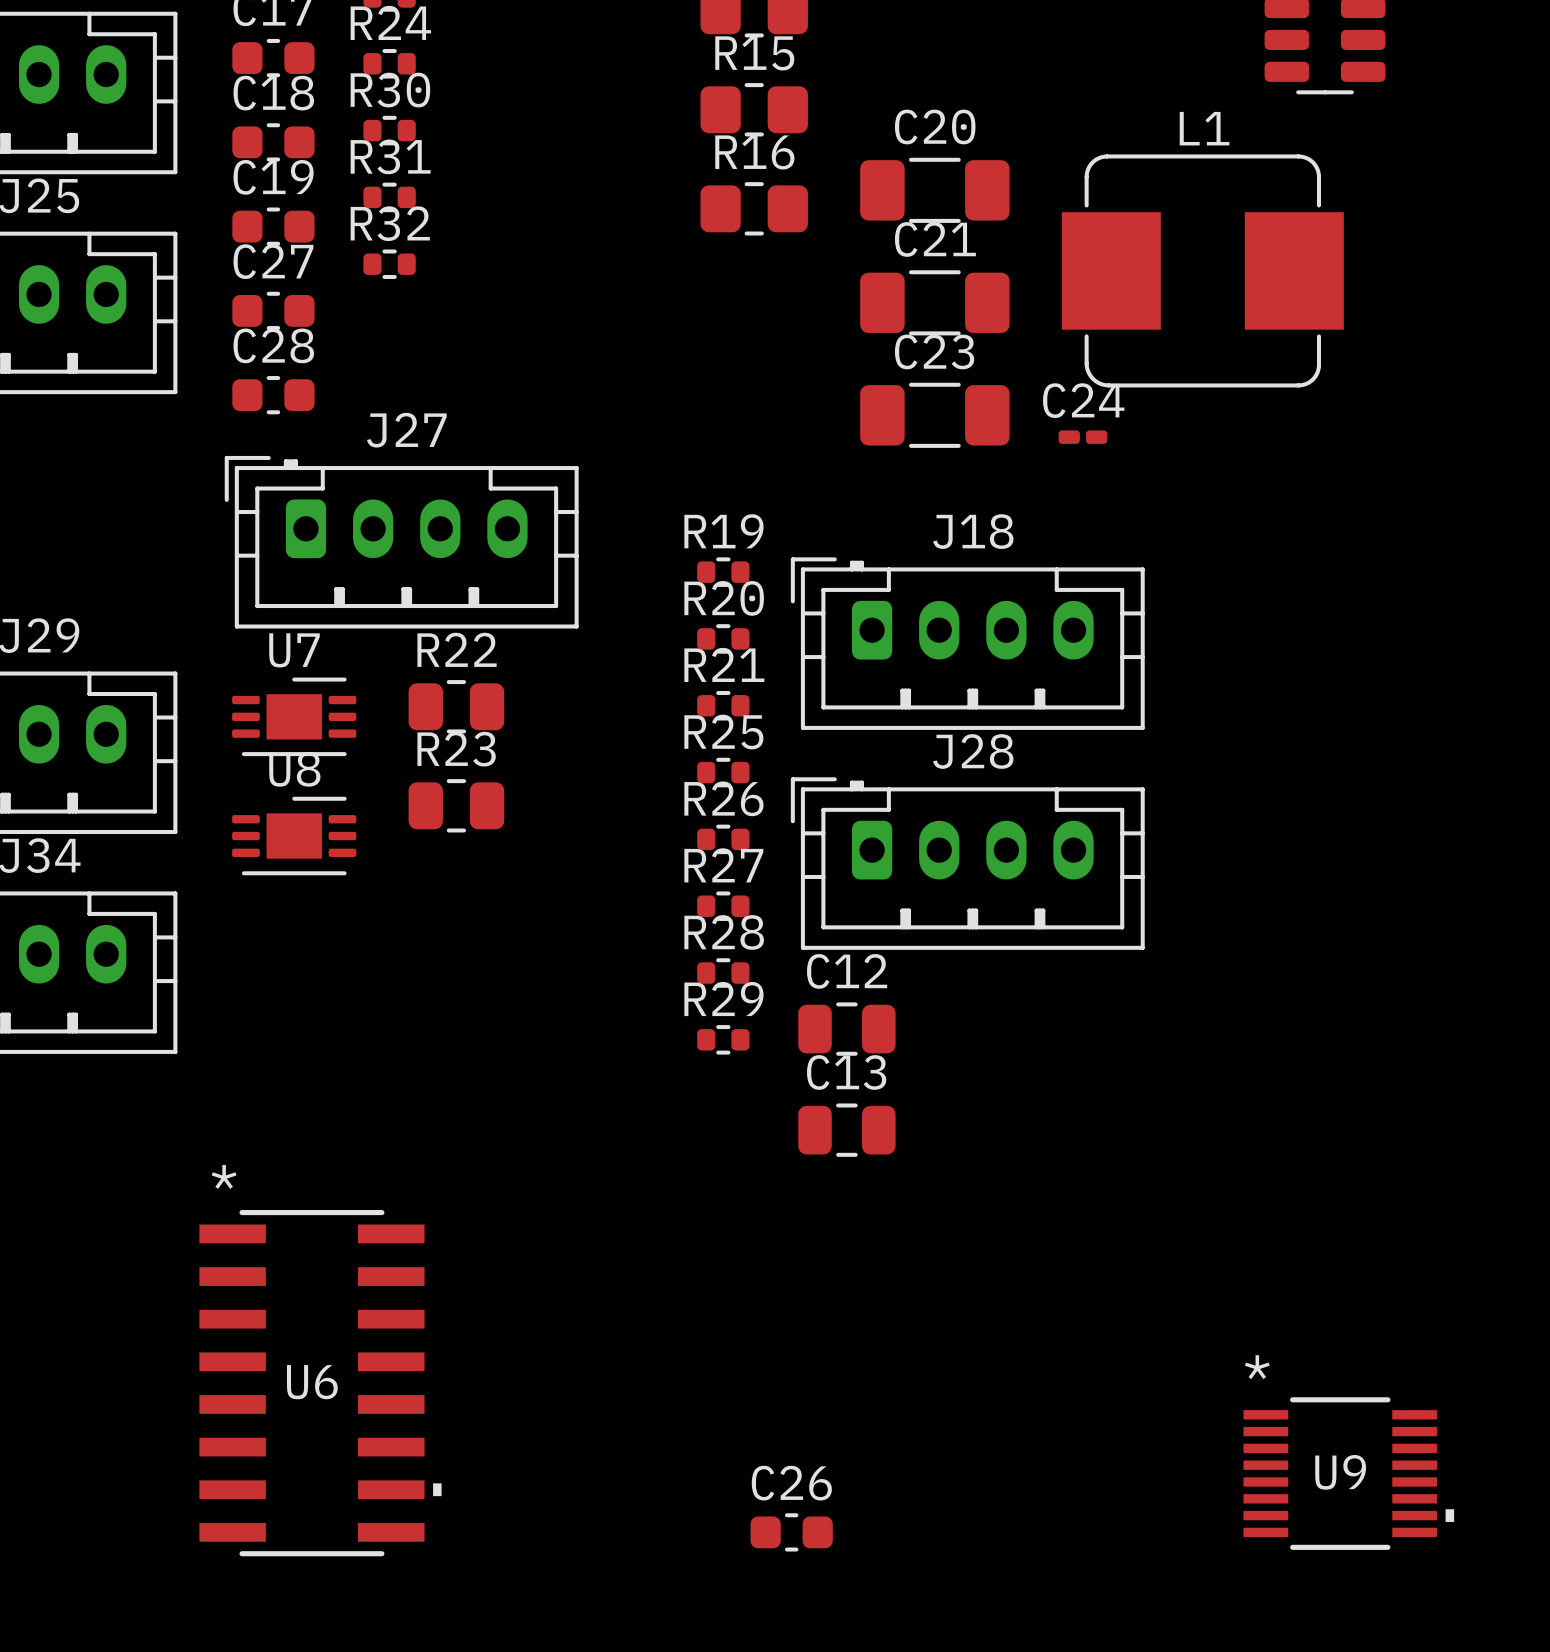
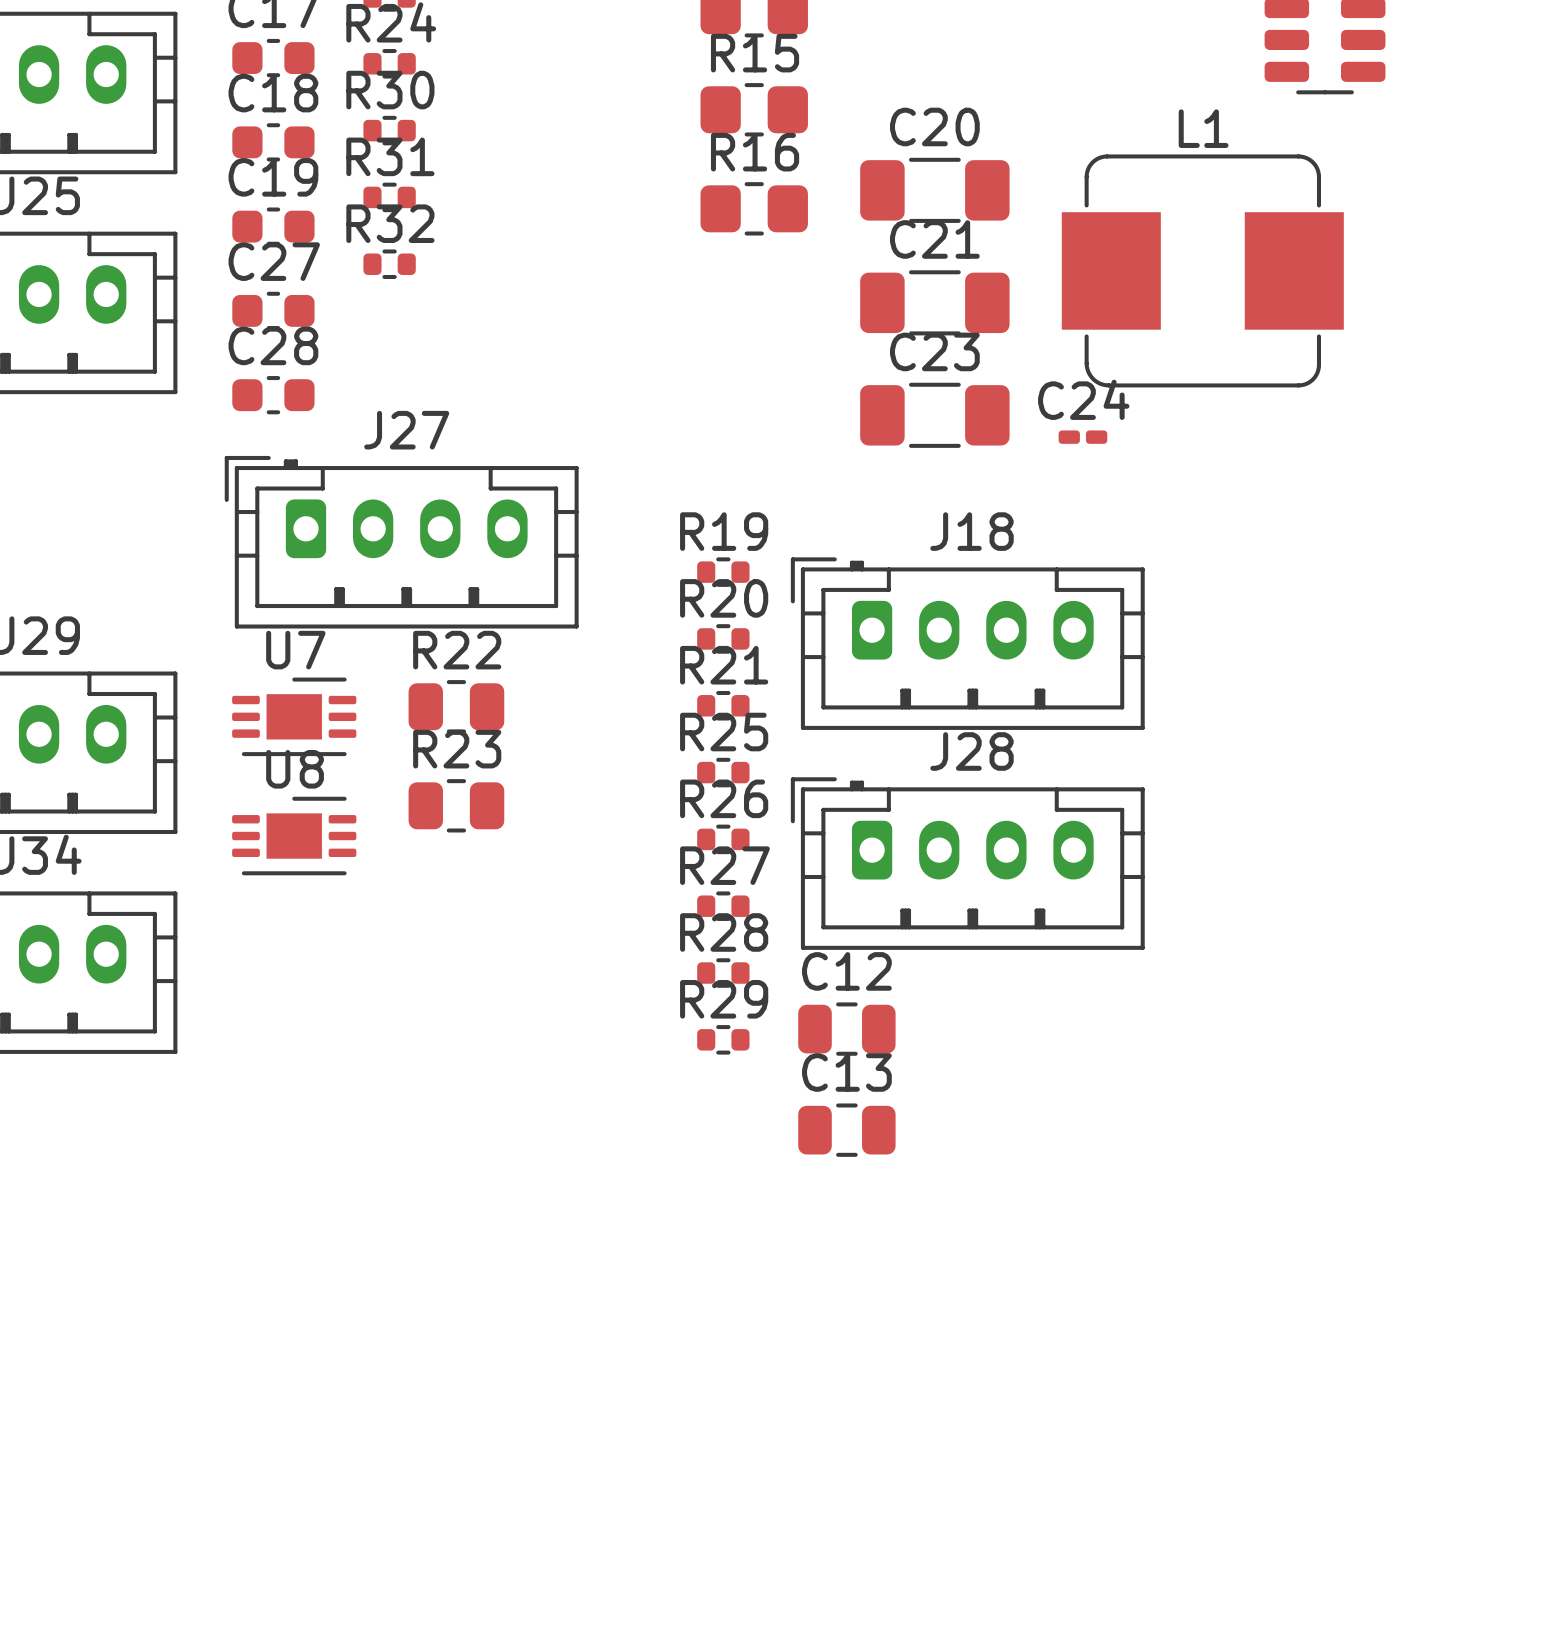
U6: (320, 1383) -> none
U9: (1348, 1473) -> none
C26: (791, 1532) -> none

